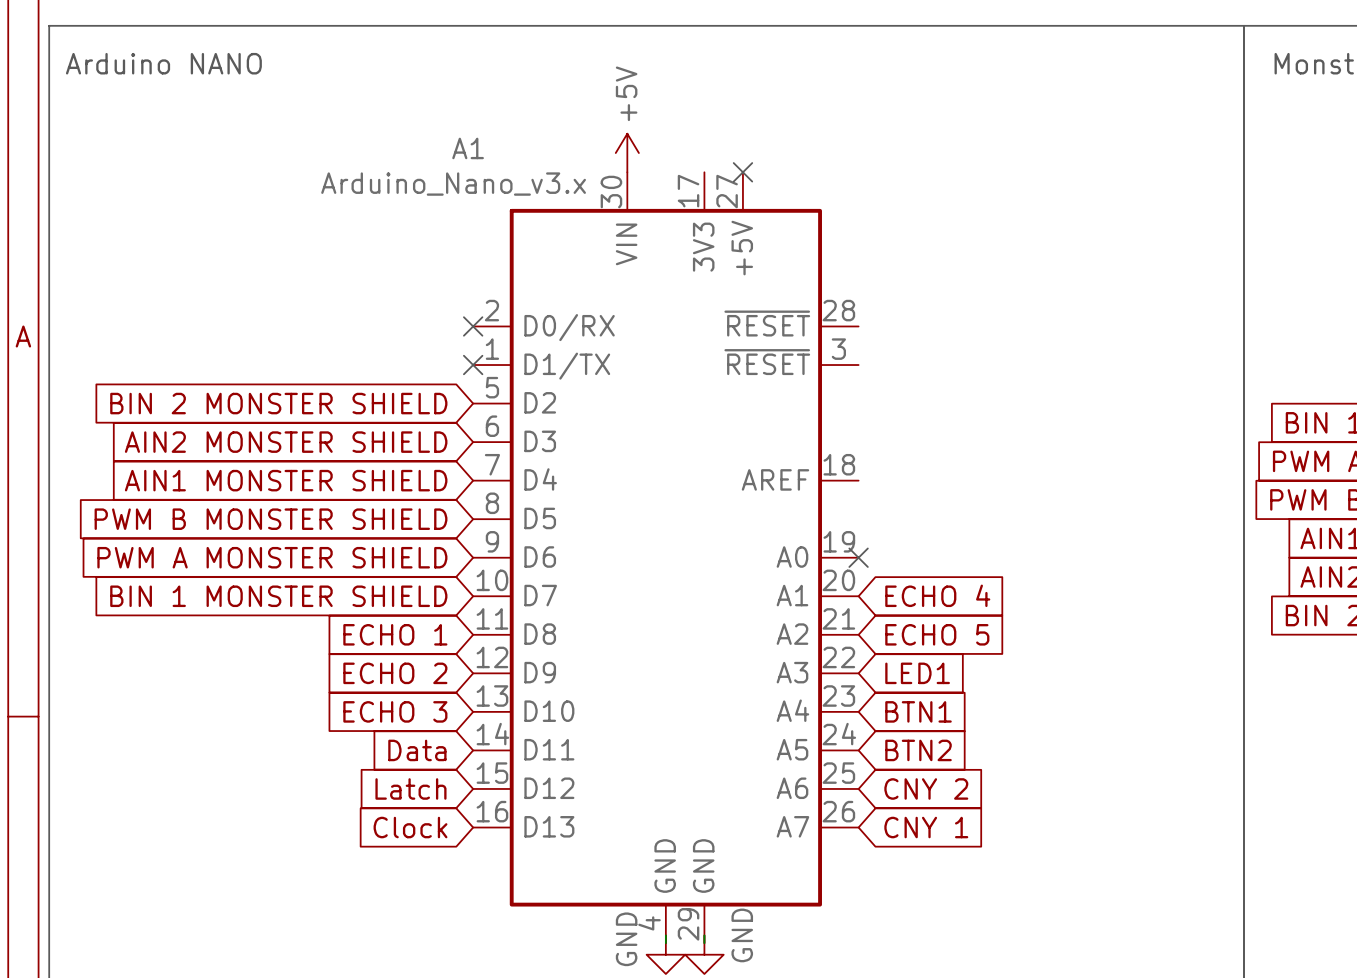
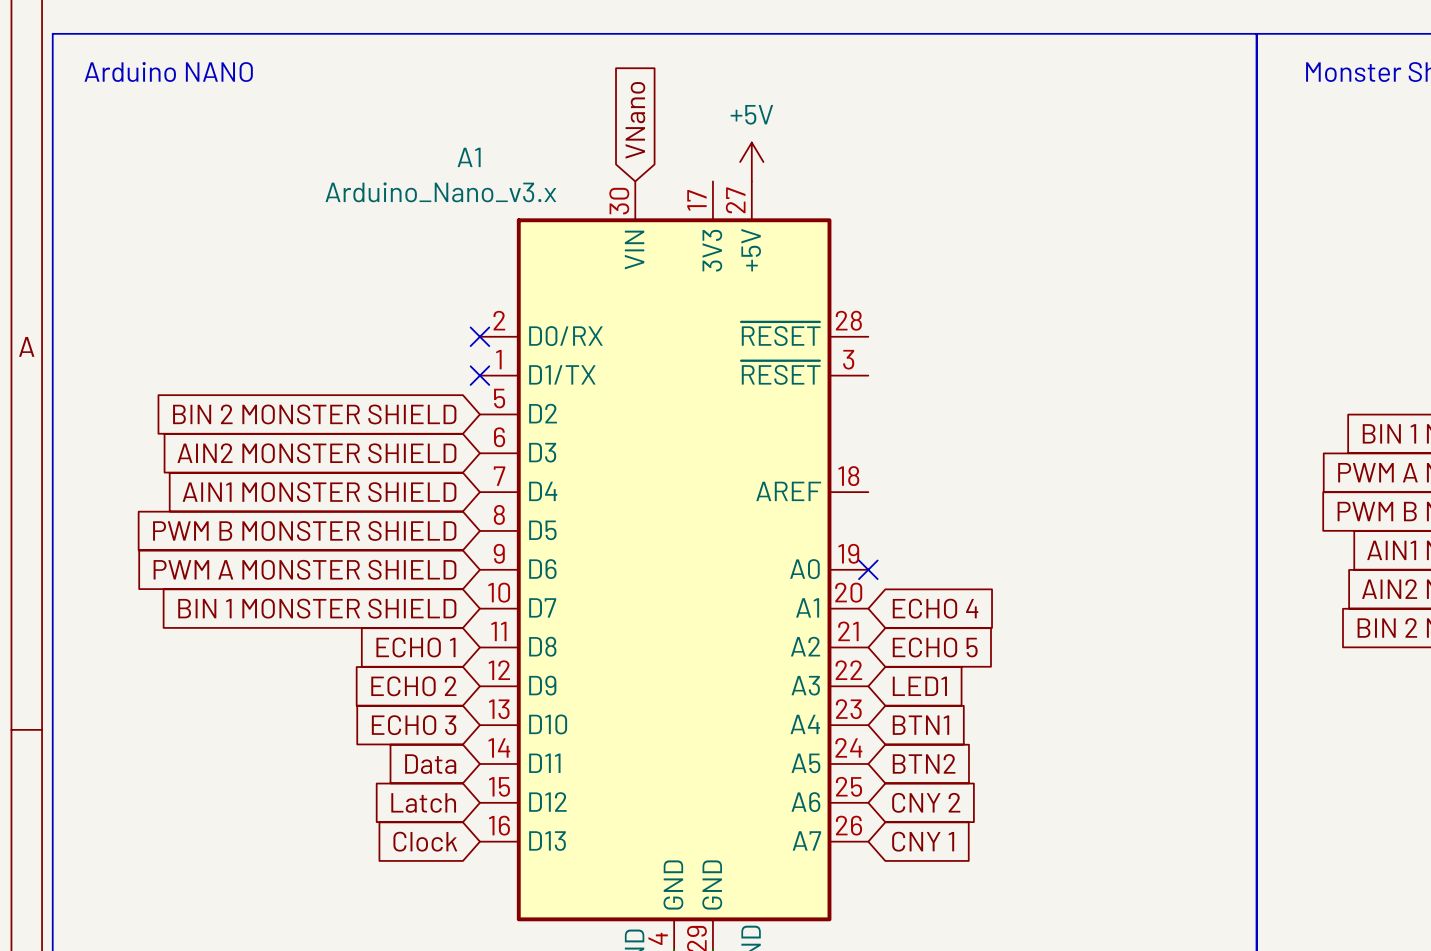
power symbol text rotation: 0° (626, 93) -> 90° clockwise (751, 114)
global label: none -> VNano (635, 120)
power symbol position: +5V (627, 153) -> +5V (751, 162)
no-connect mark: (742, 172) -> none

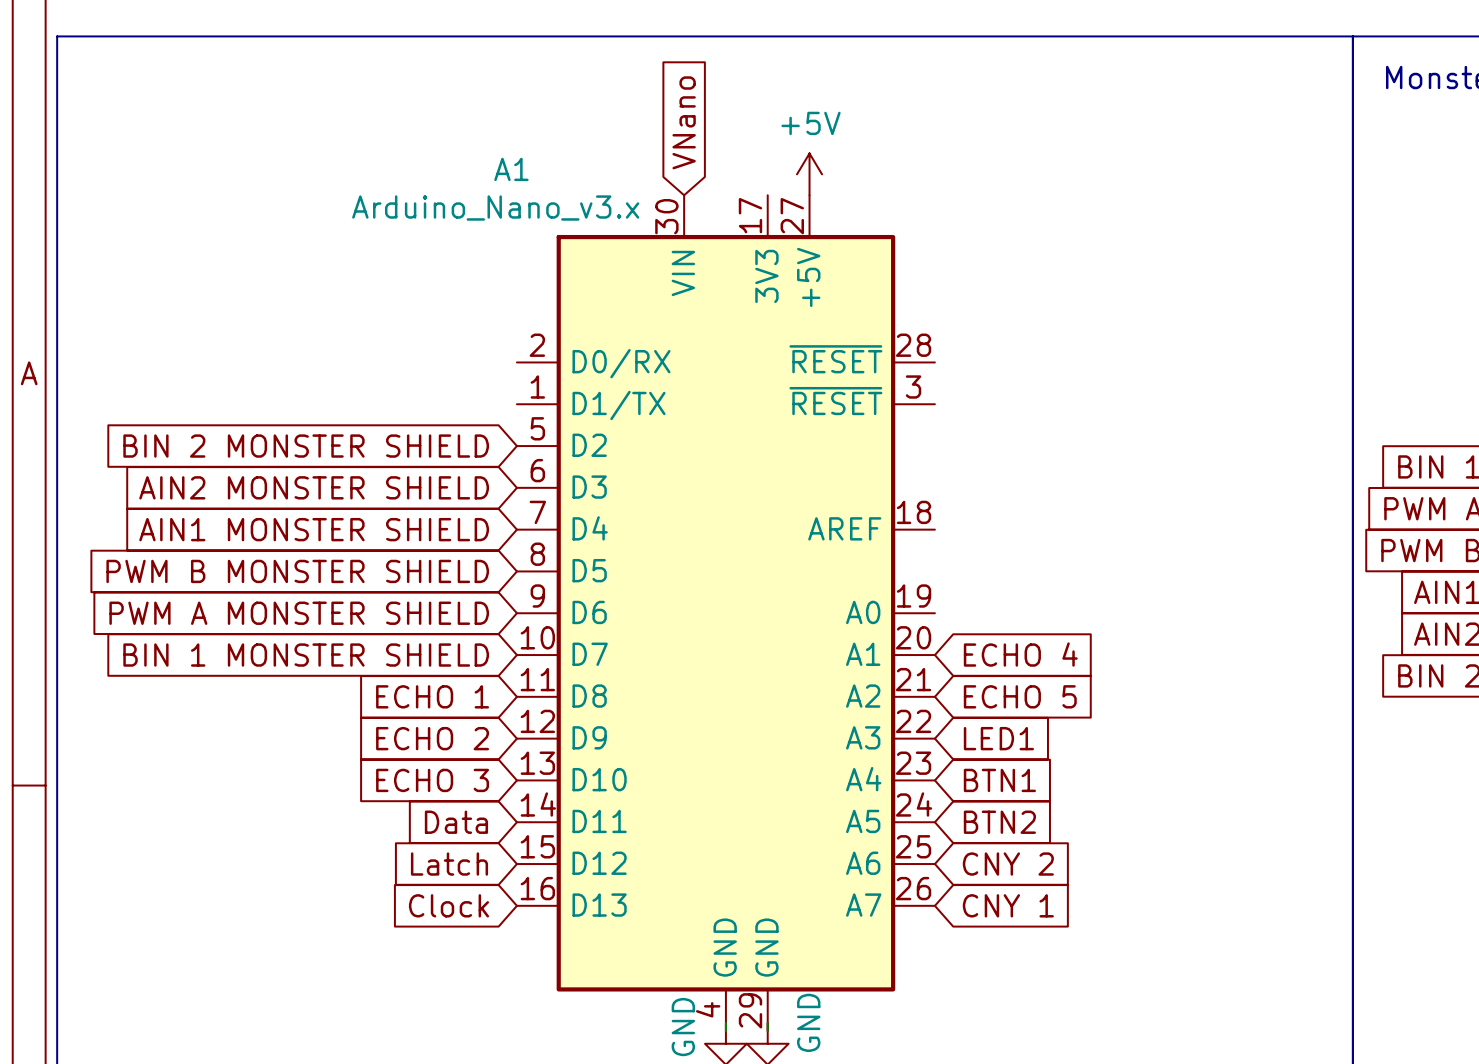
text: Arduino NANO (168, 71) -> none
no-connect mark: (479, 336) -> none
no-connect mark: (479, 375) -> none
no-connect mark: (868, 569) -> none

